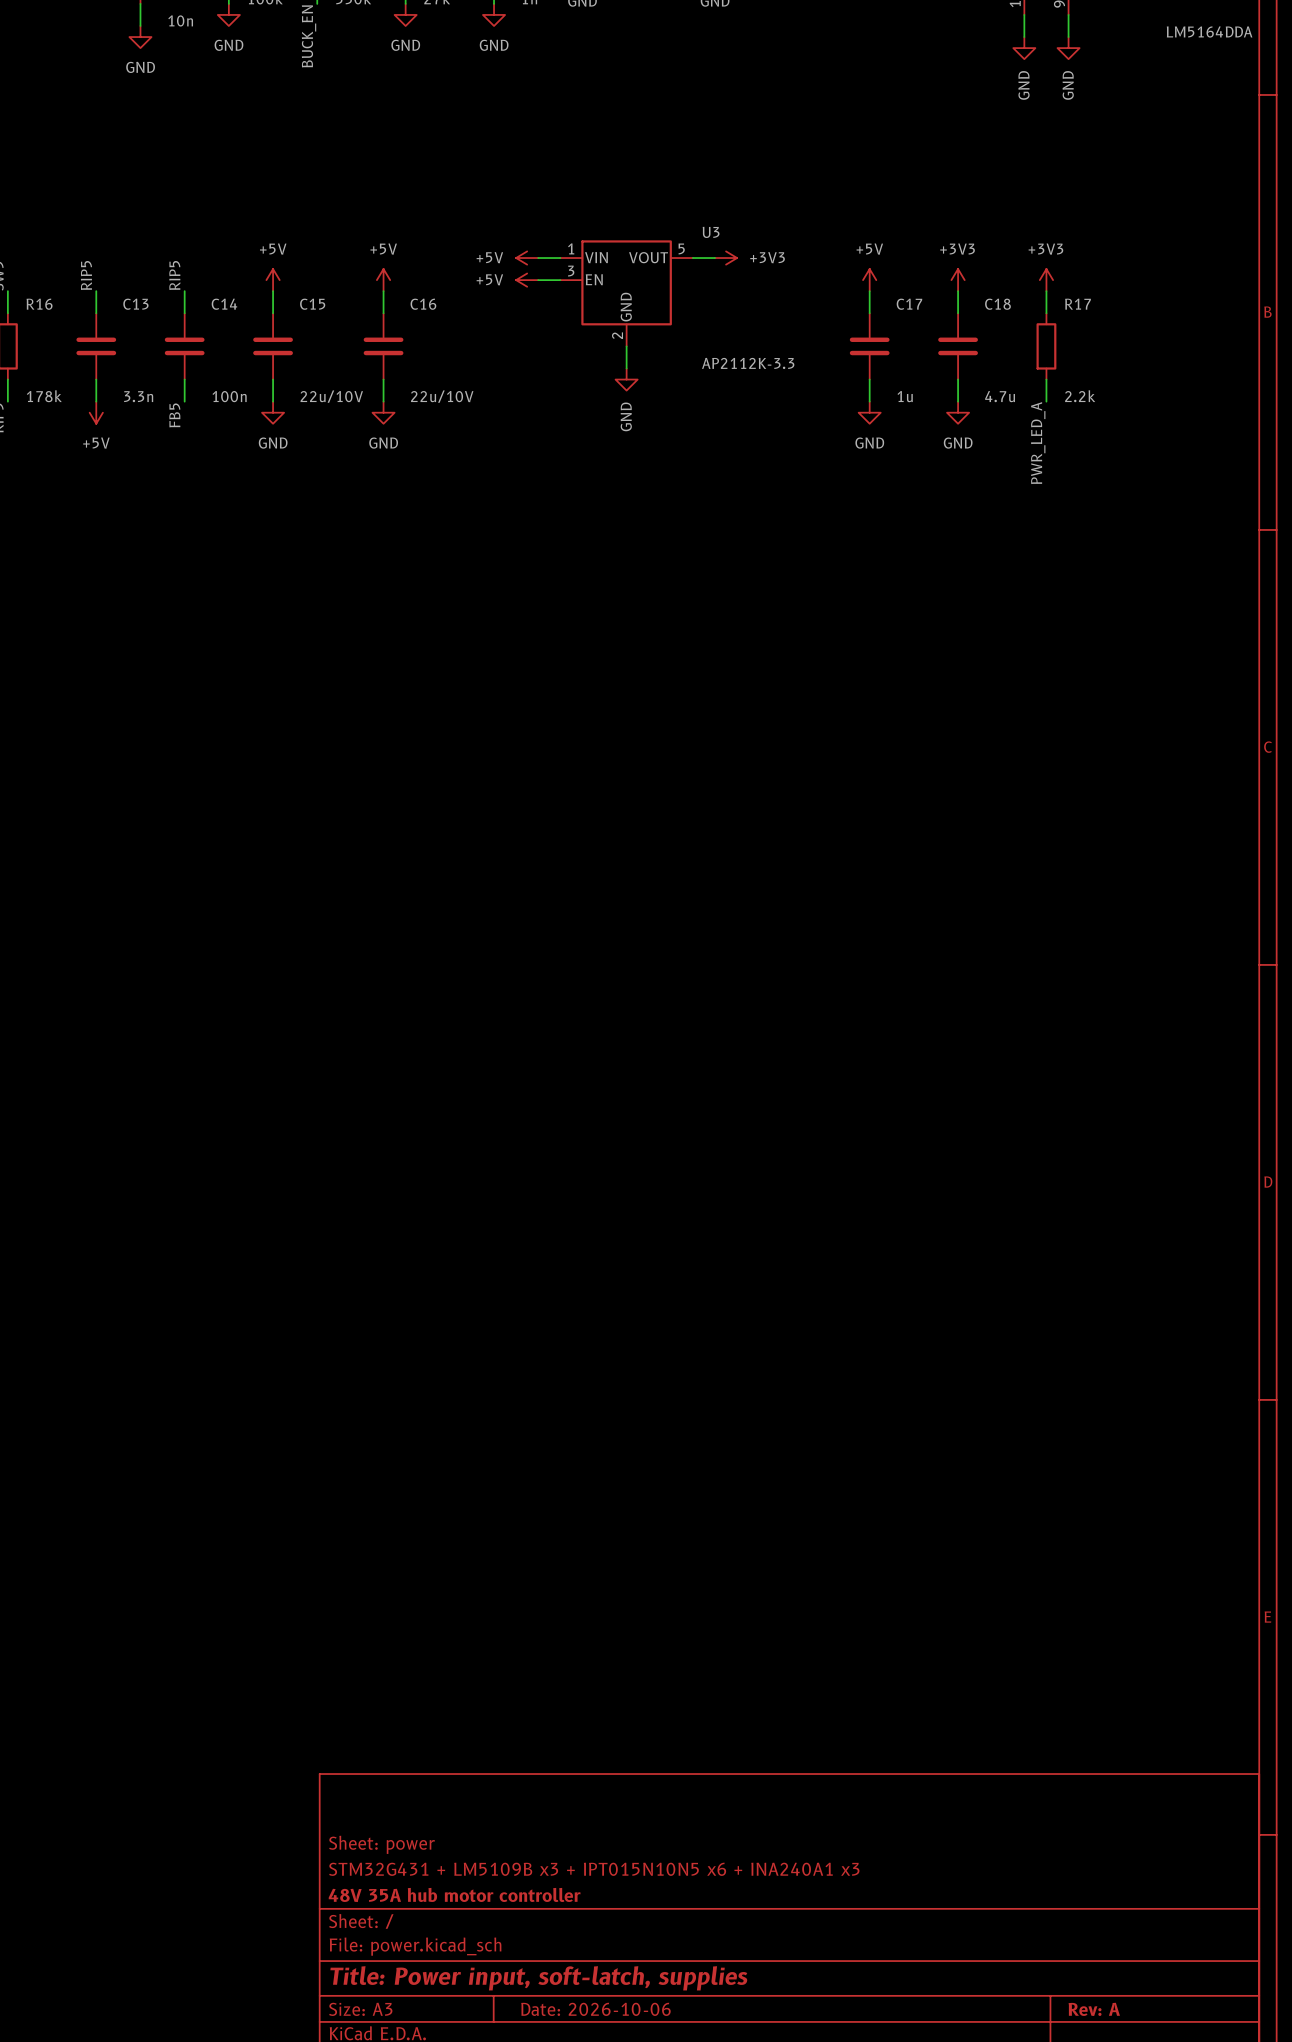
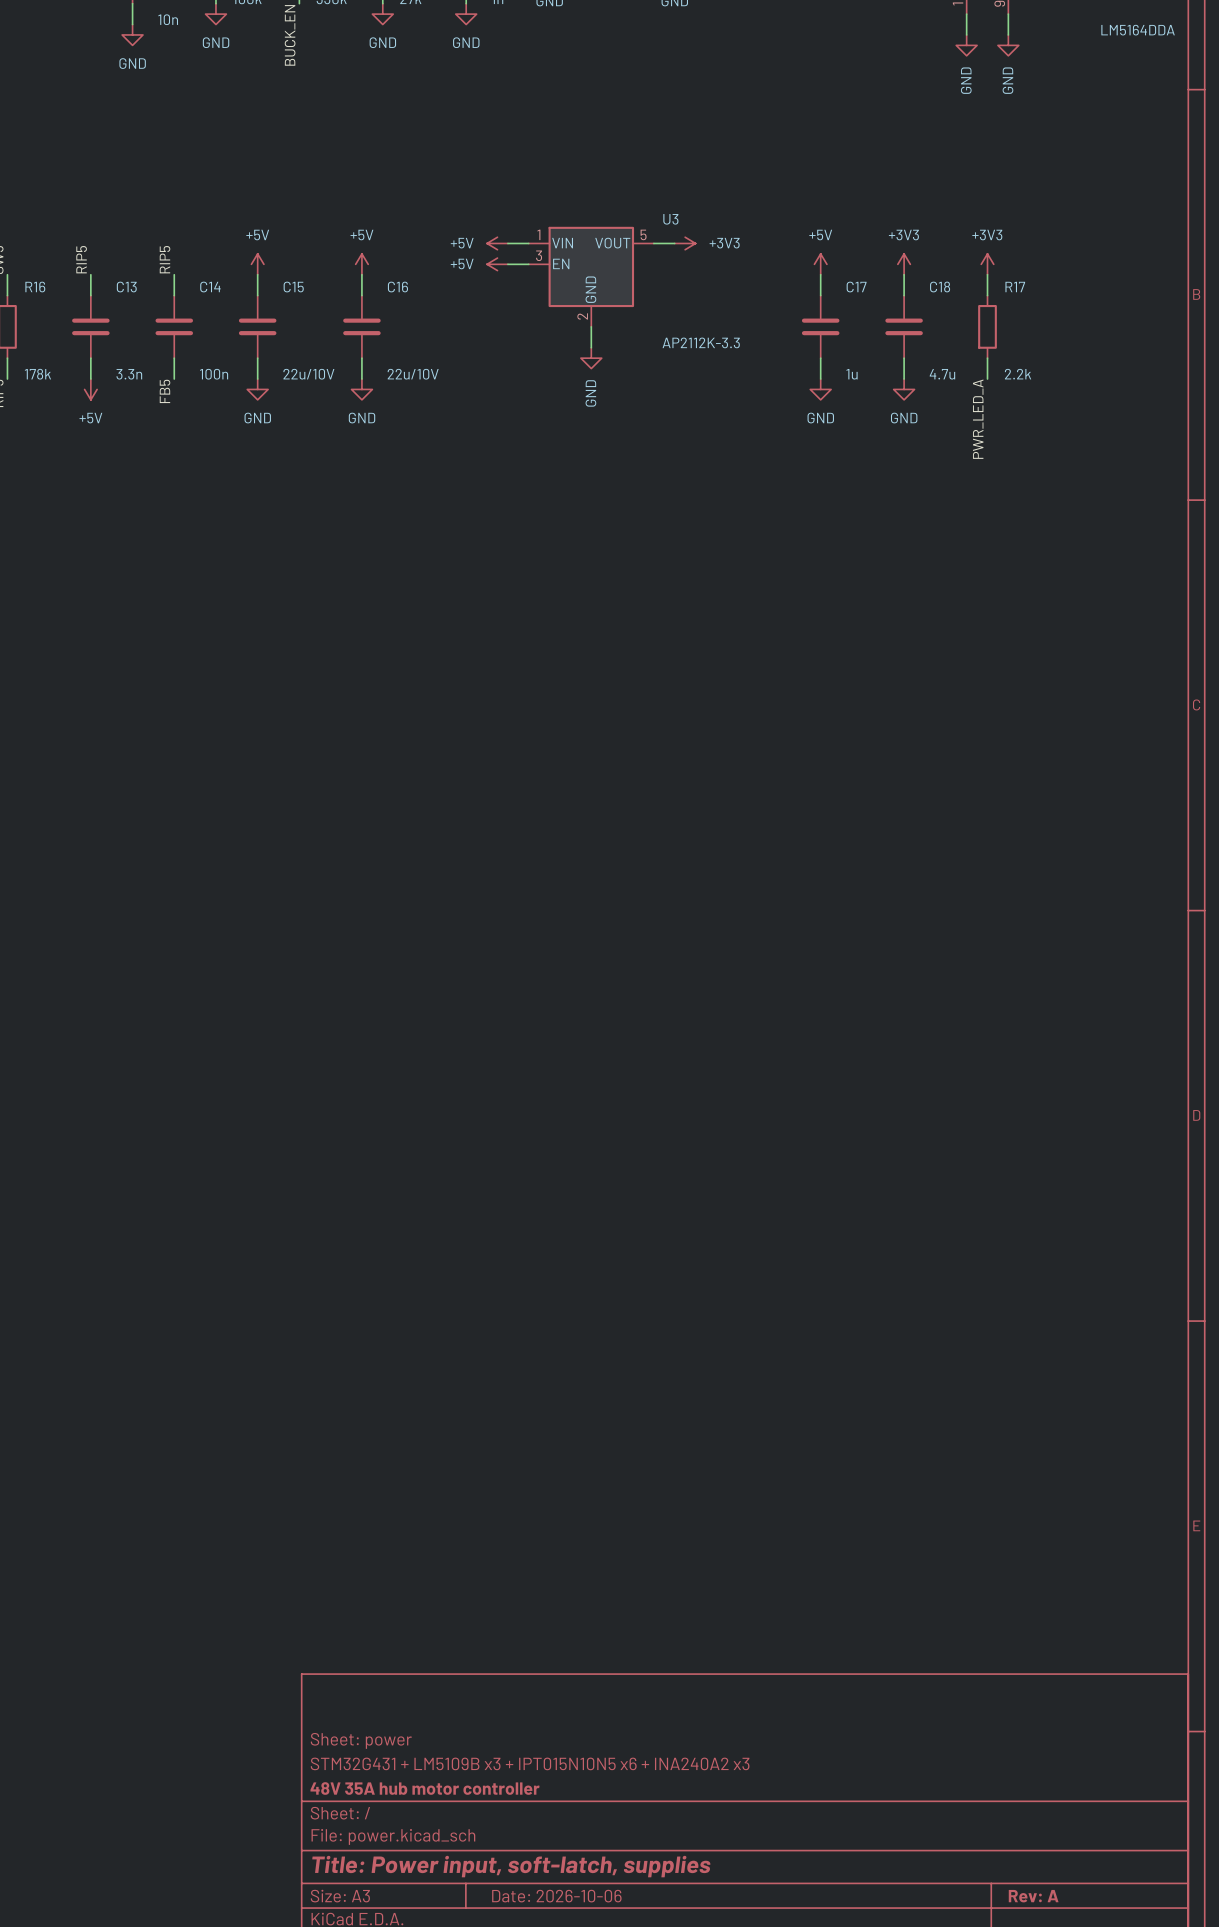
title block: STM32G431 + LM5109B x3 + IPT015N10N5 x6 + INA240A1 x3 (594, 1869) -> STM32G431 + LM5109B x3 + IPT015N10N5 x6 + INA240A2 x3 (530, 1763)

